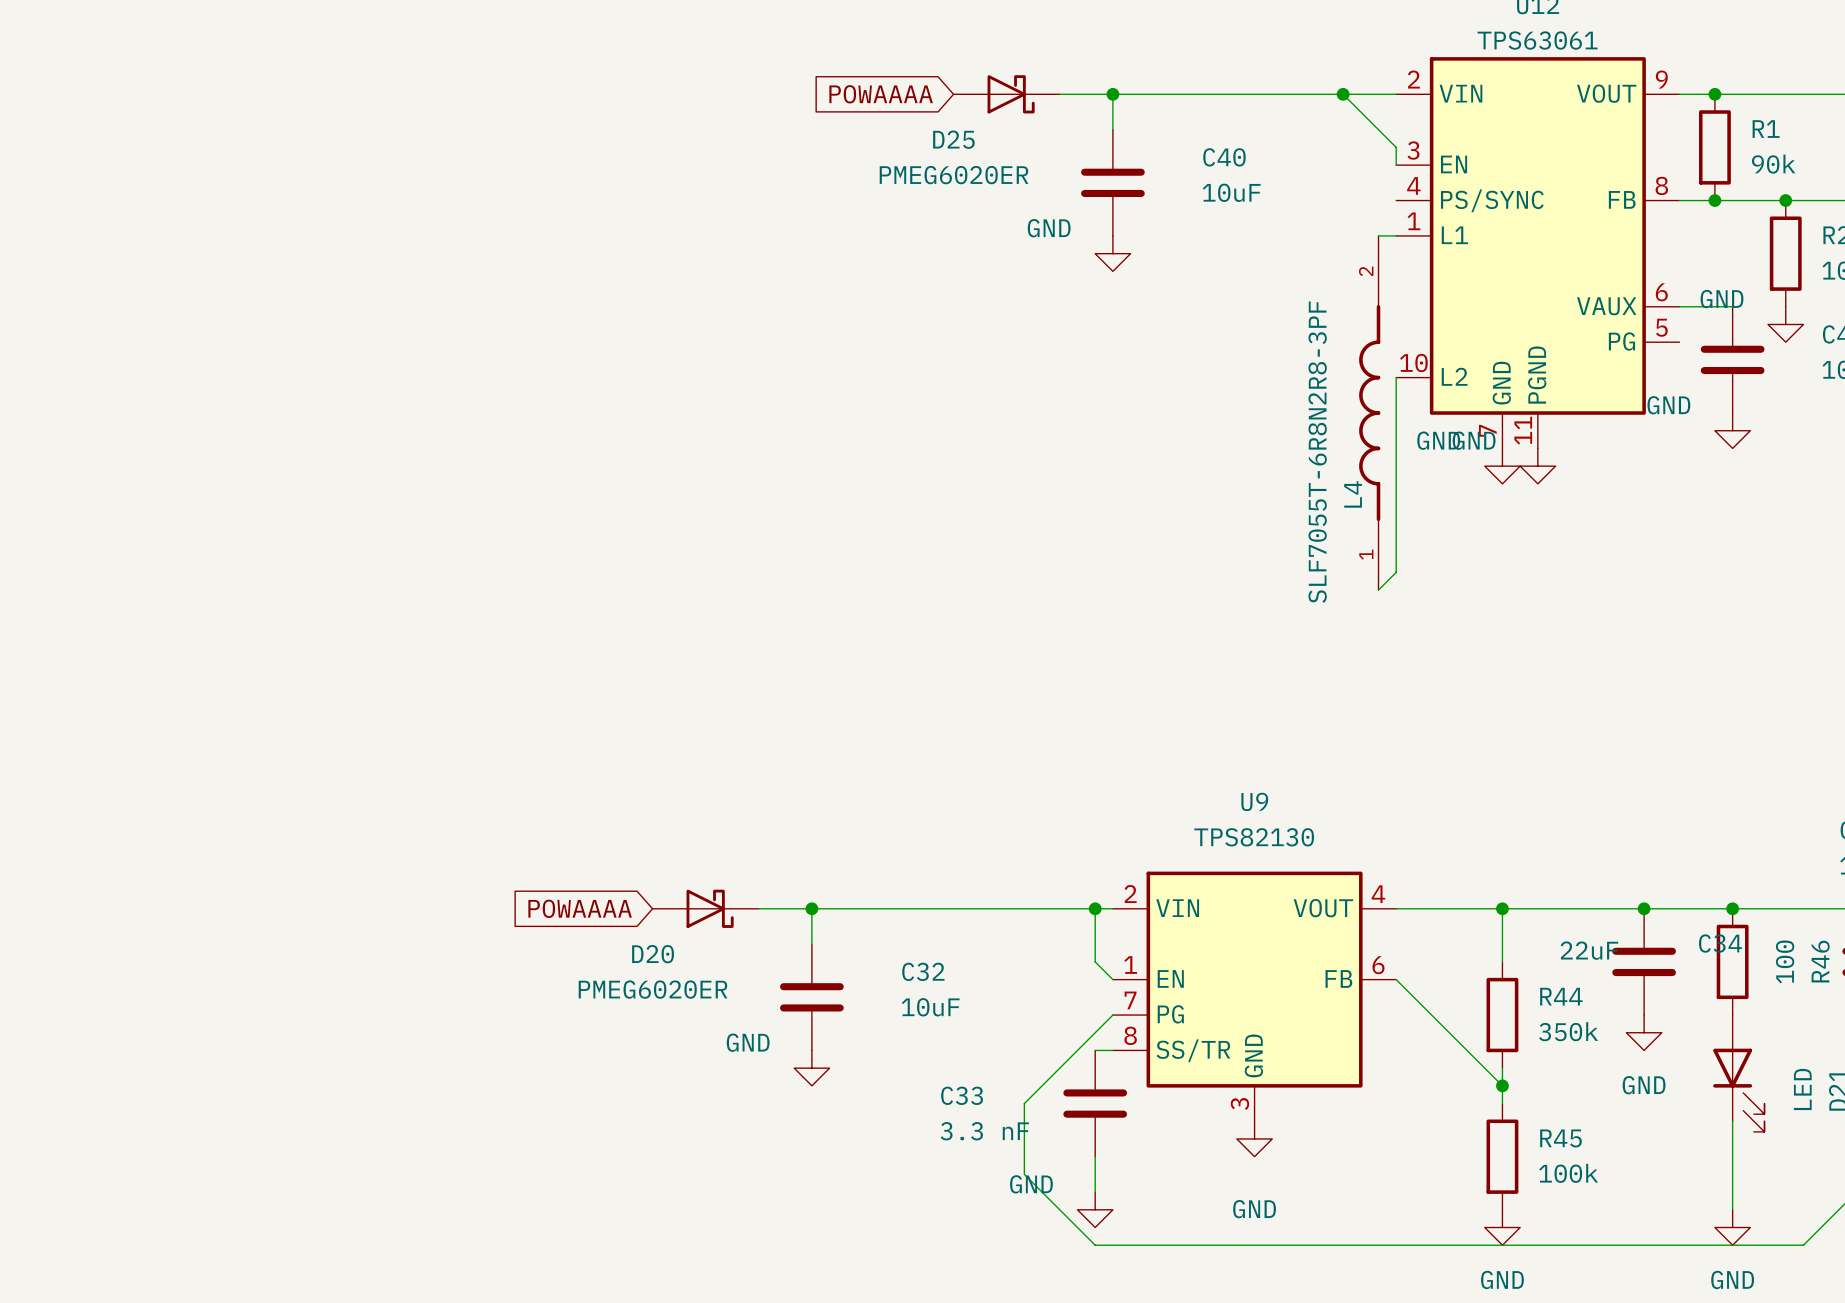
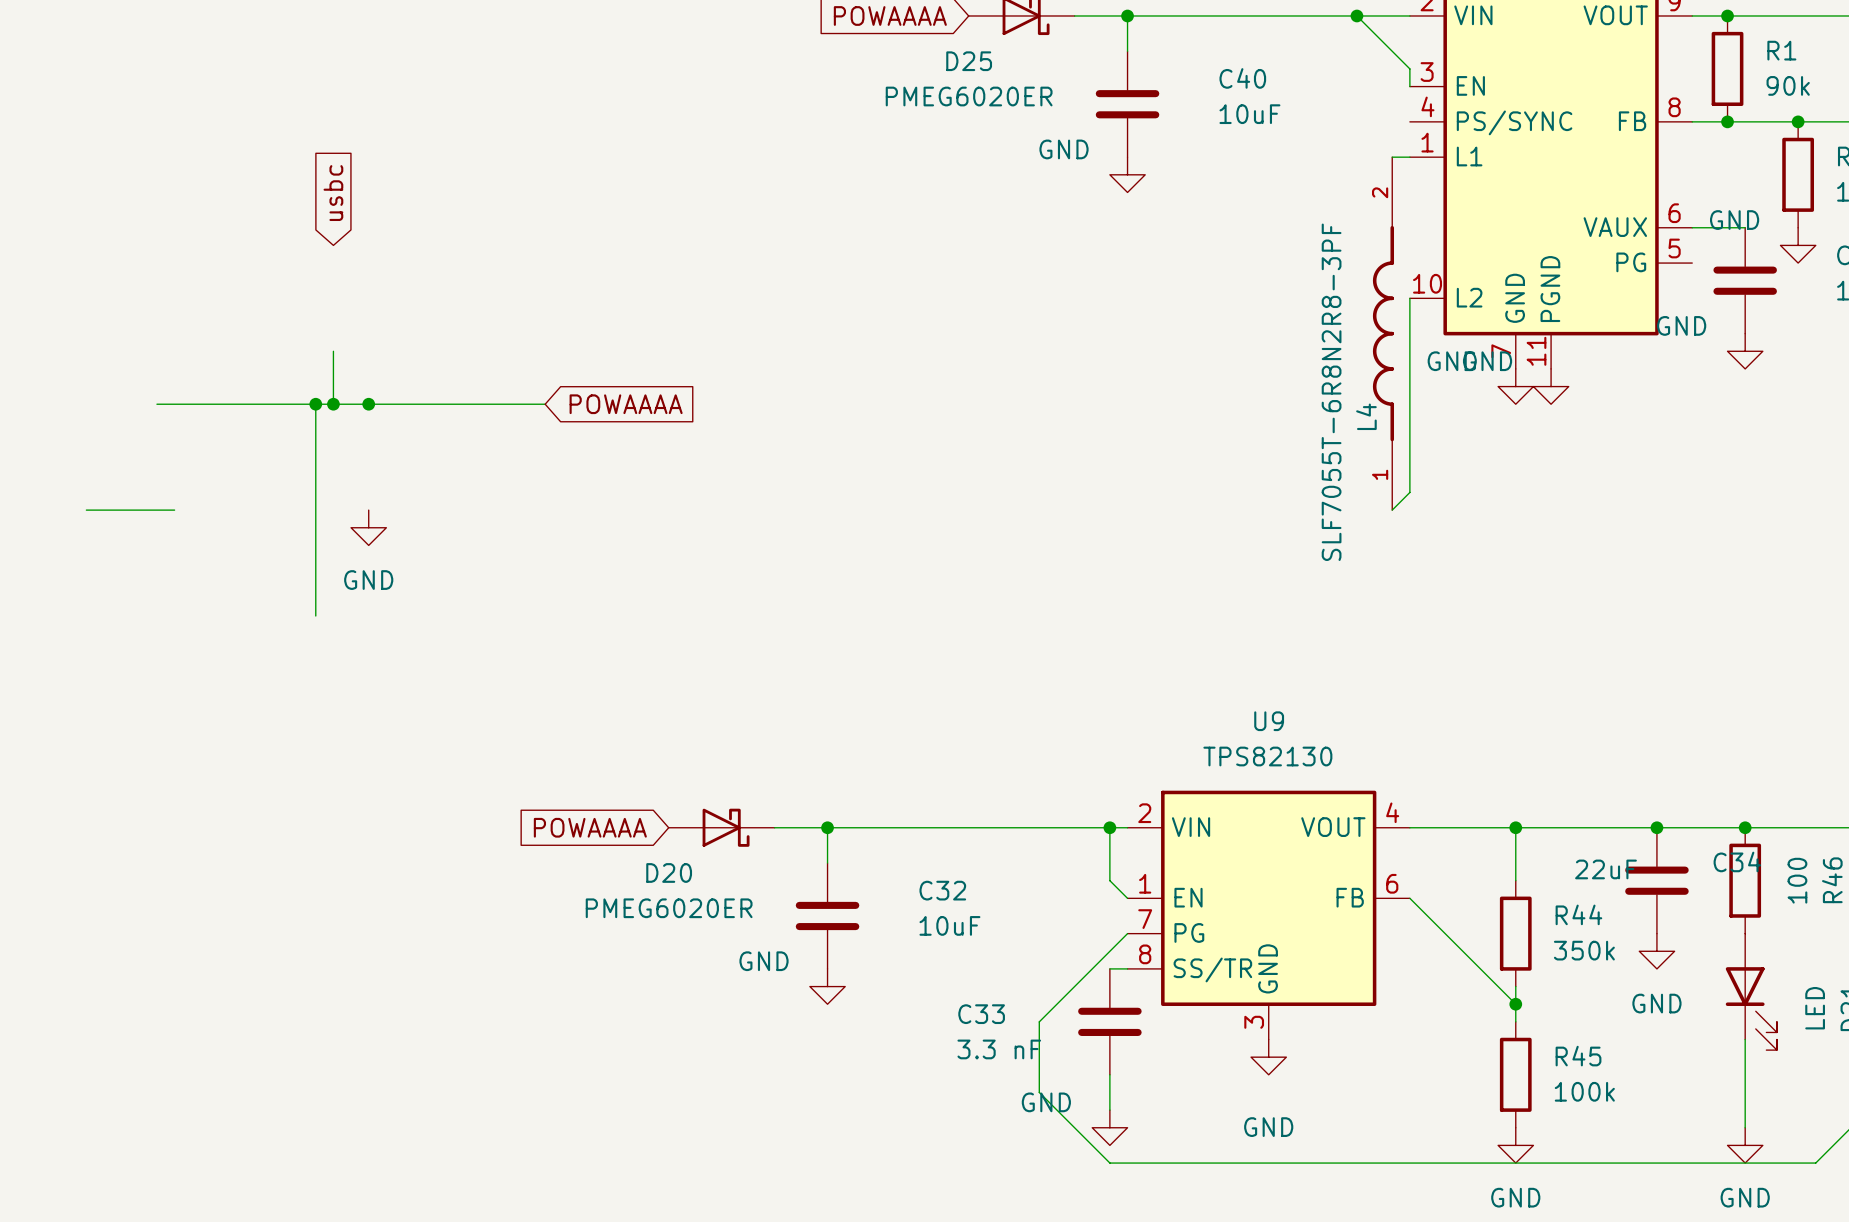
global label: none -> usbc (333, 193)
wire: none -> (333, 351) (333, 404)
wire: none -> (156, 404) (545, 404)
wire: none -> (315, 404) (315, 615)
junction: none -> (315, 404)
junction: none -> (333, 404)
junction: none -> (368, 404)
global label: none -> POWAAAA (626, 404)
wire: none -> (86, 510) (174, 510)
power symbol: none -> GND (368, 527)

